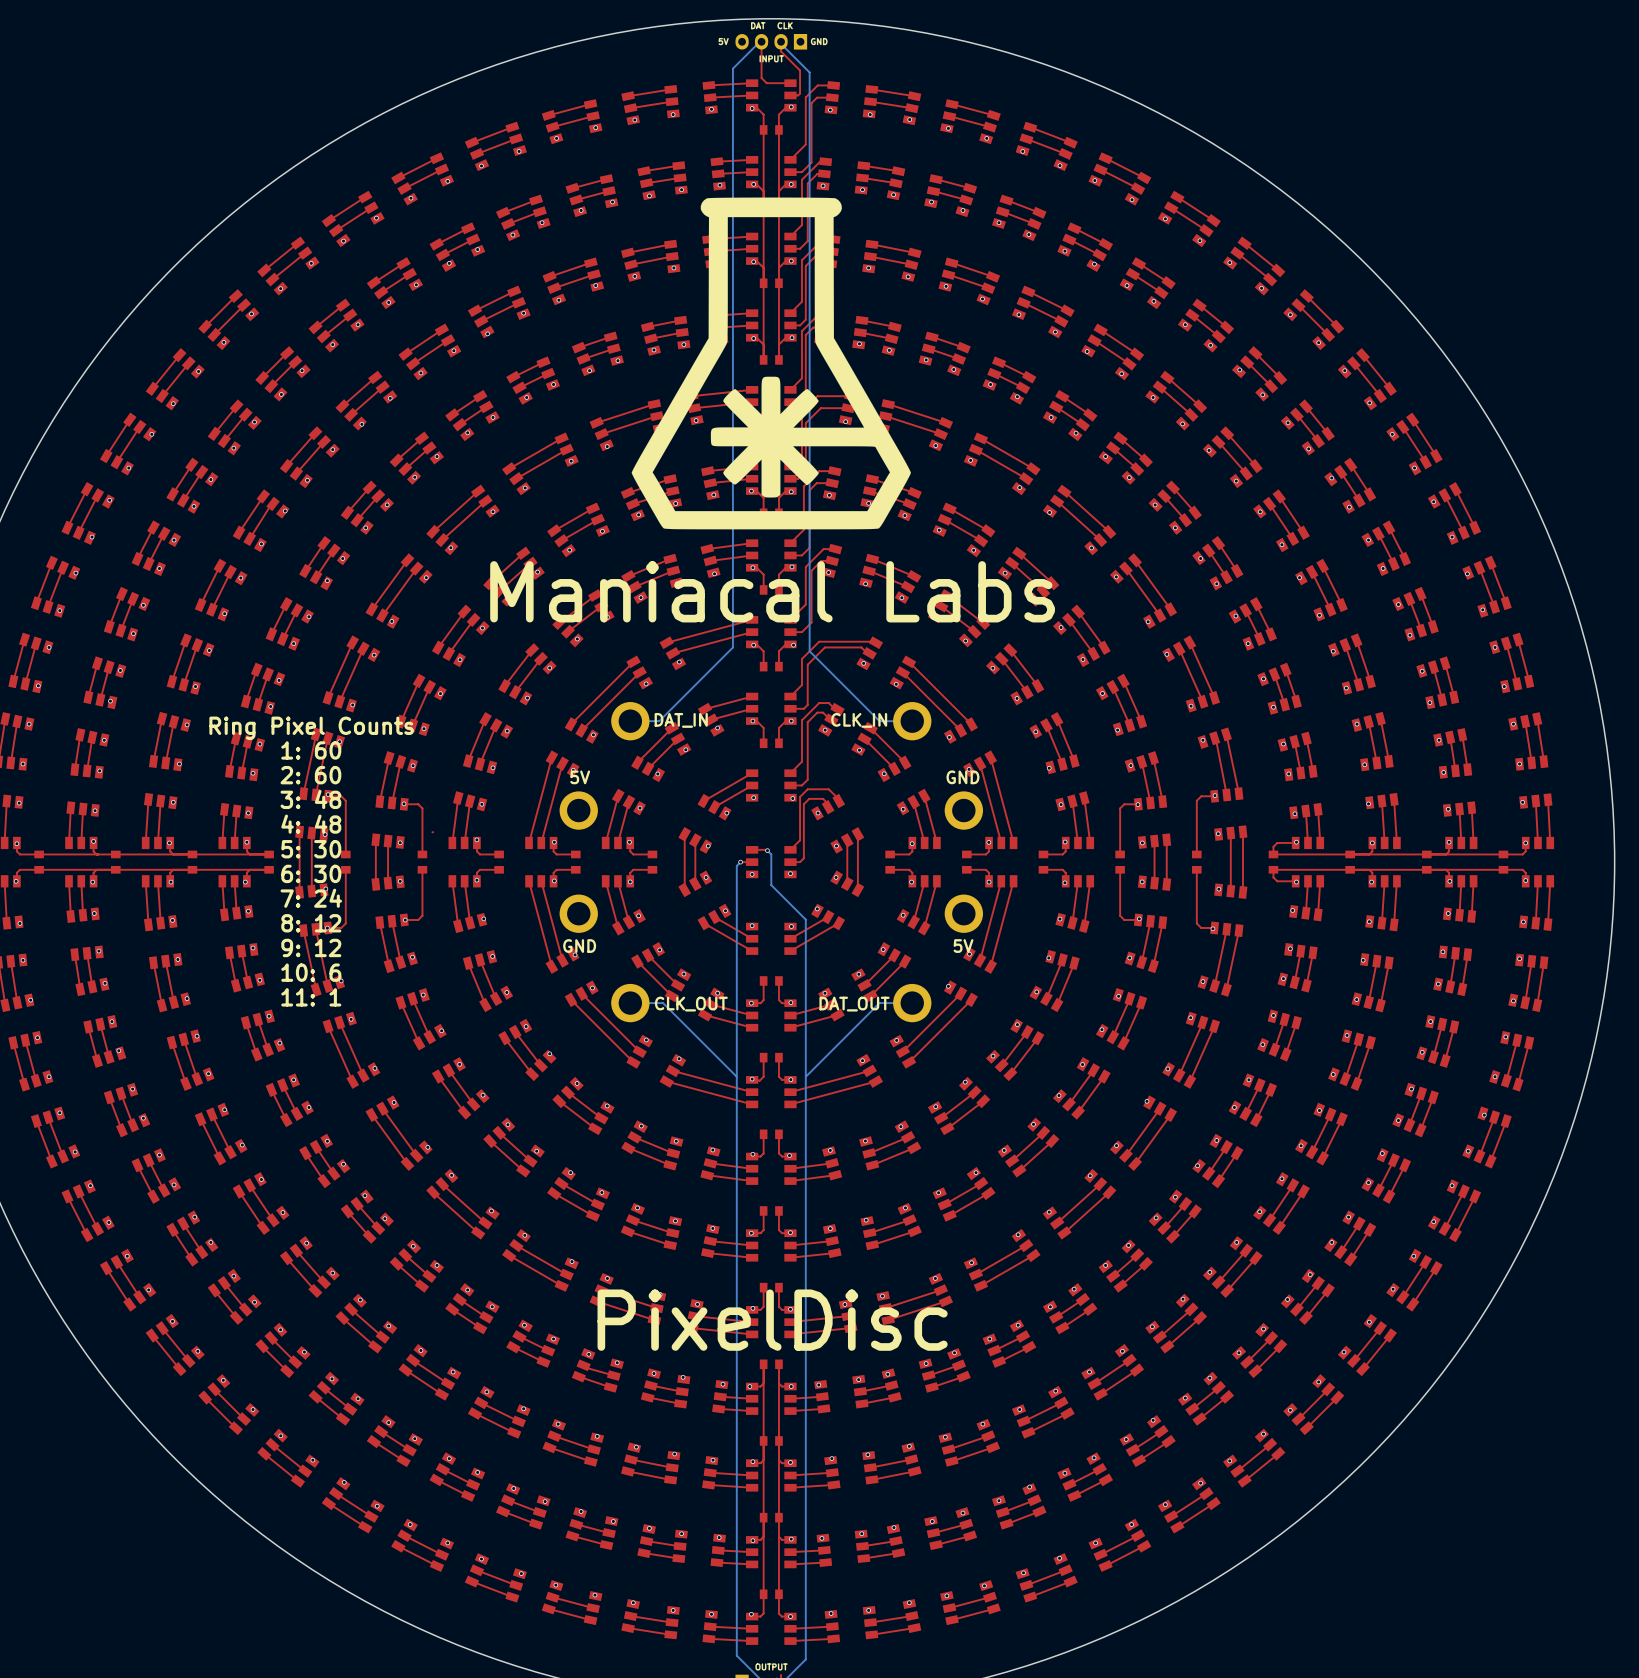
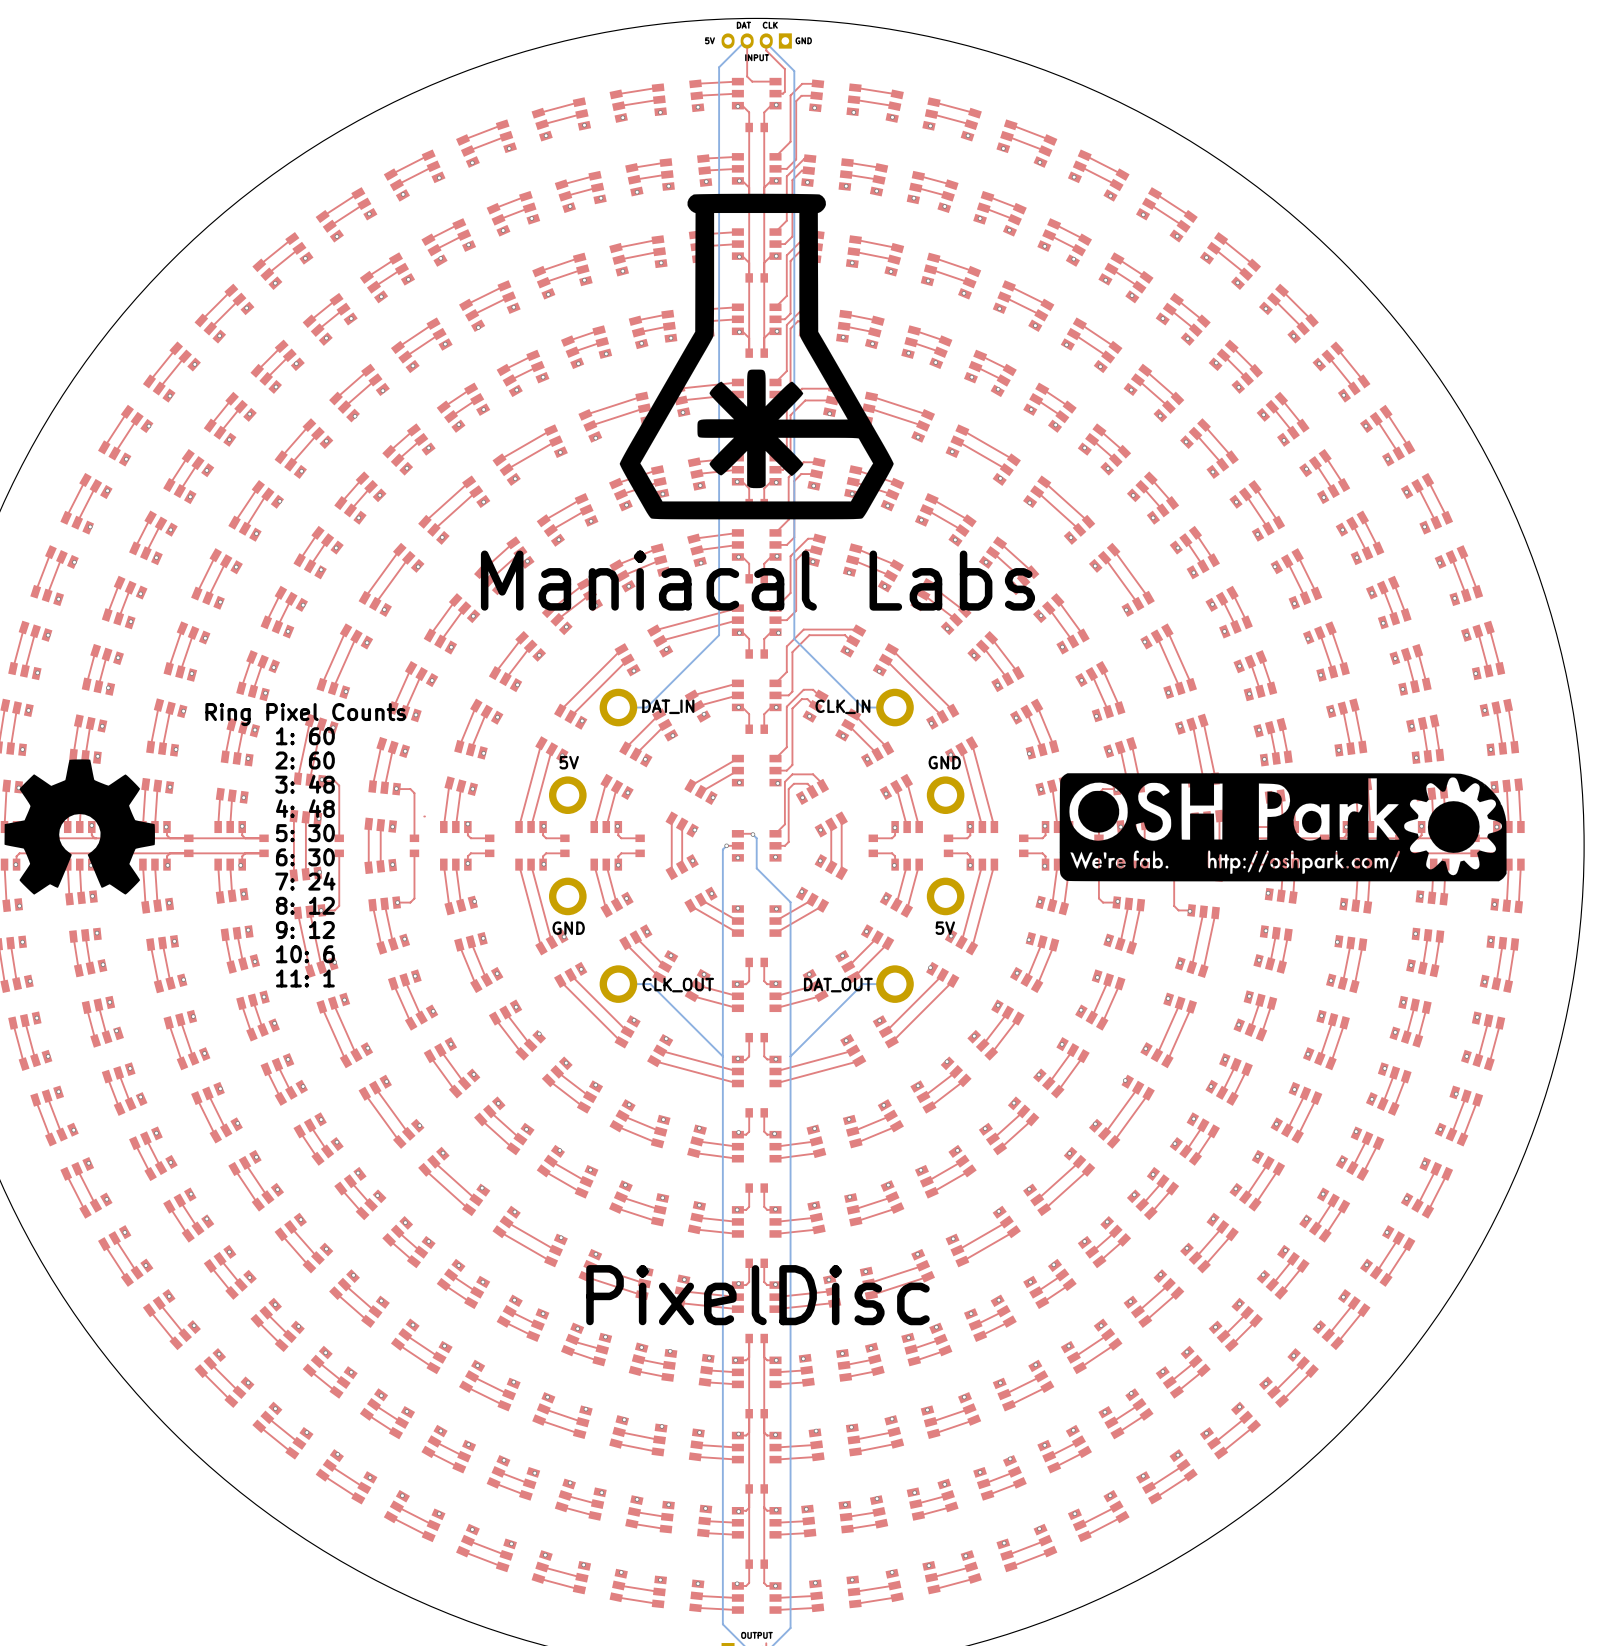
drawing: none -> [4, 759, 155, 895]
drawing: none -> [1059, 773, 1507, 882]

